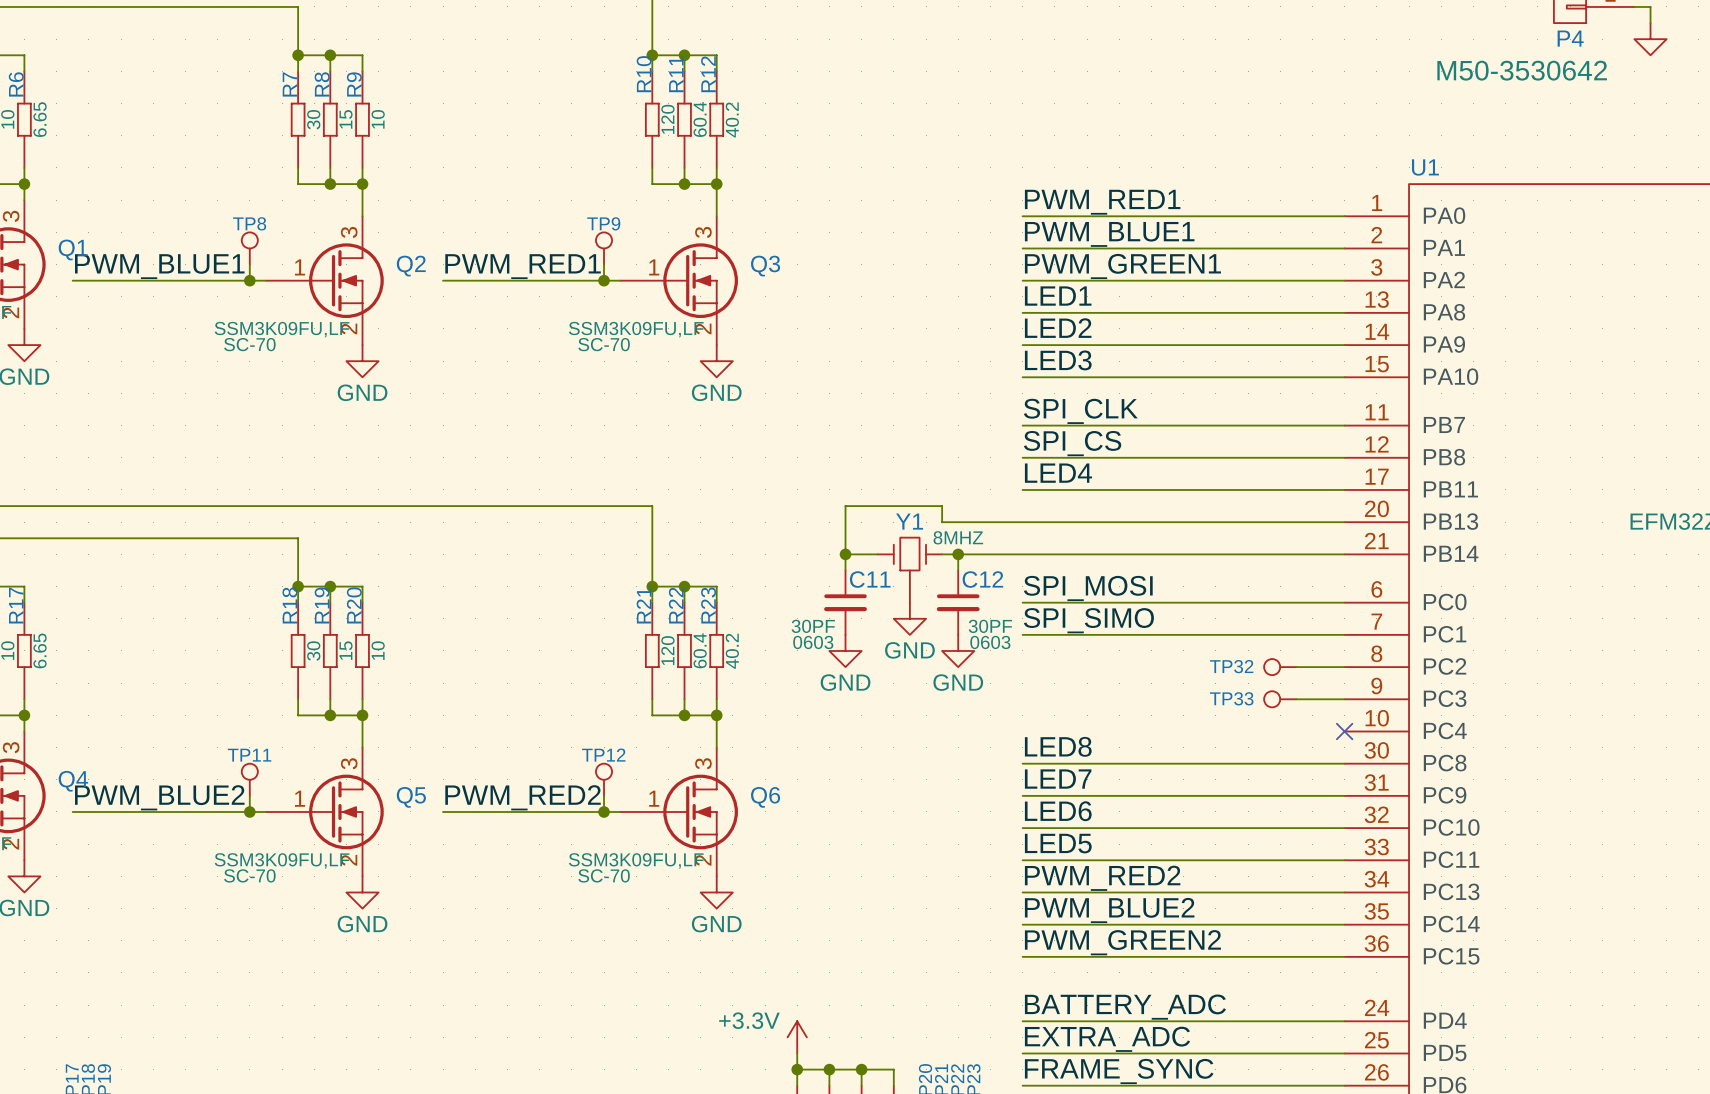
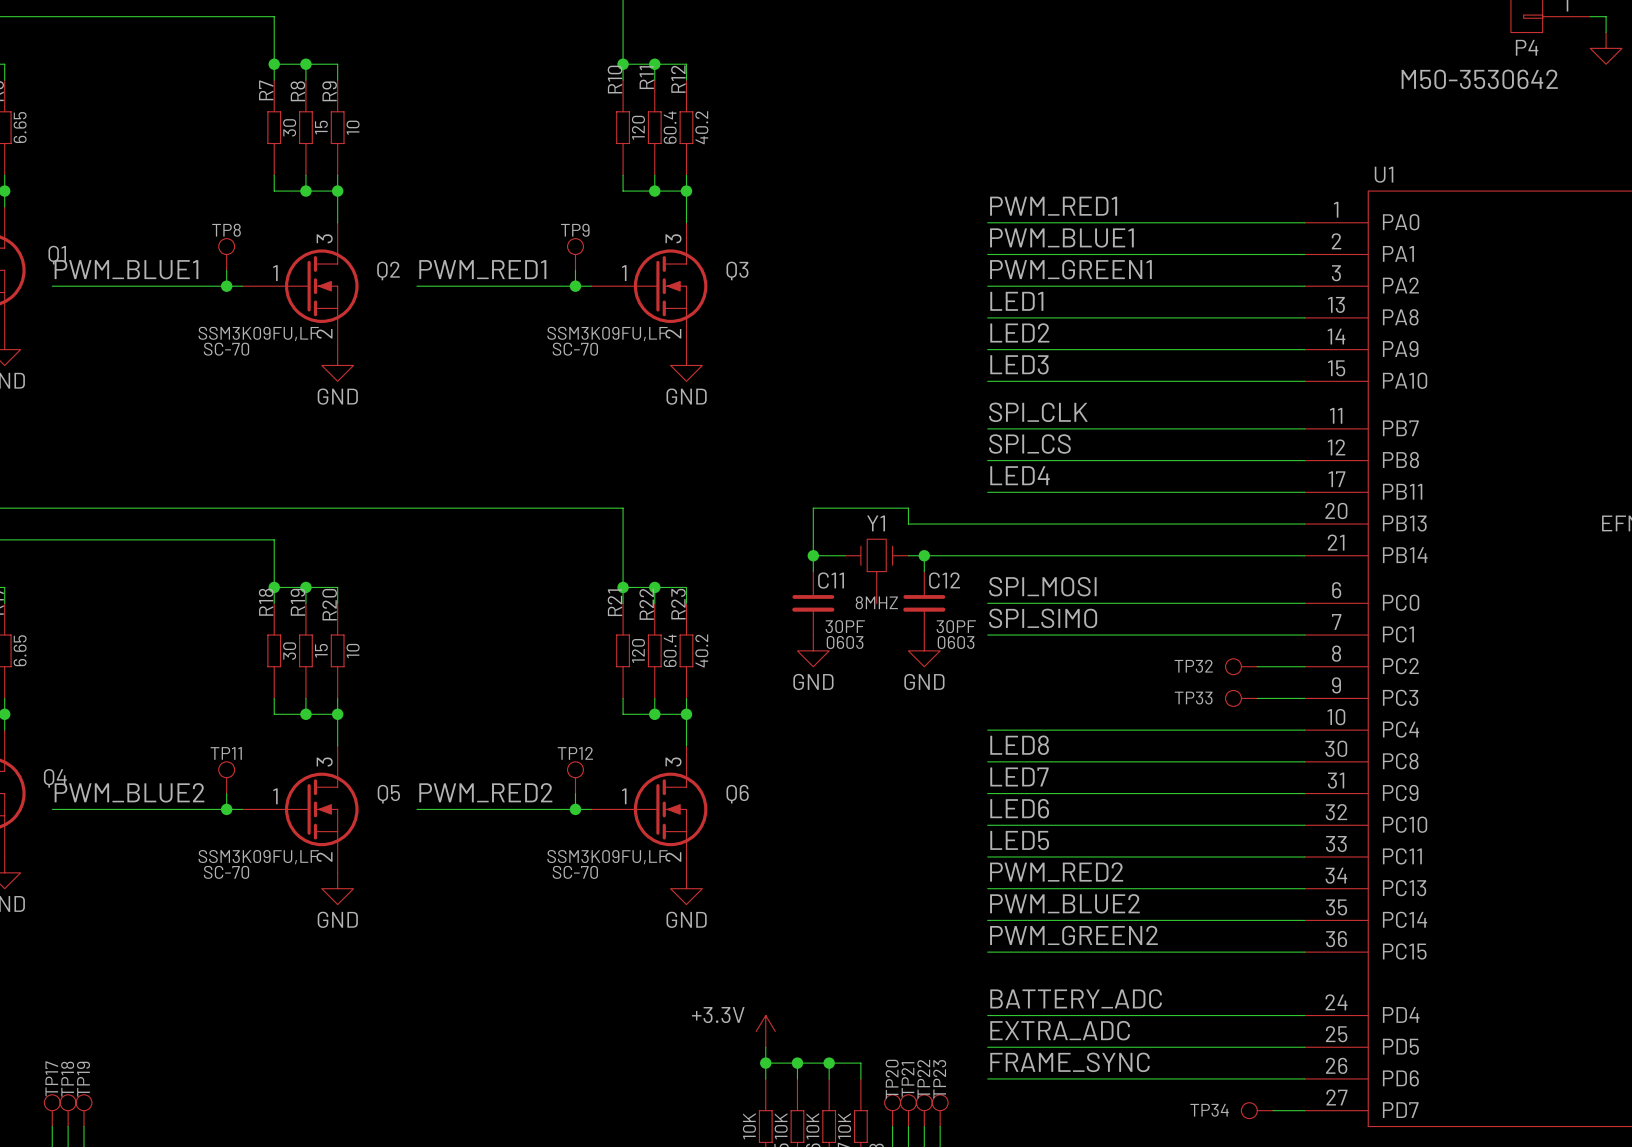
Y1 text position: 8MHZ (958, 537) -> 8MHZ (876, 602)
power symbol: GND (909, 618) -> none
C11 text position: 30PF (813, 626) -> 30PF (845, 626)
C11 text position: 0603 (813, 642) -> 0603 (845, 642)
wire: none -> (987, 730) (1304, 730)
no-connect mark: (1344, 731) -> none

